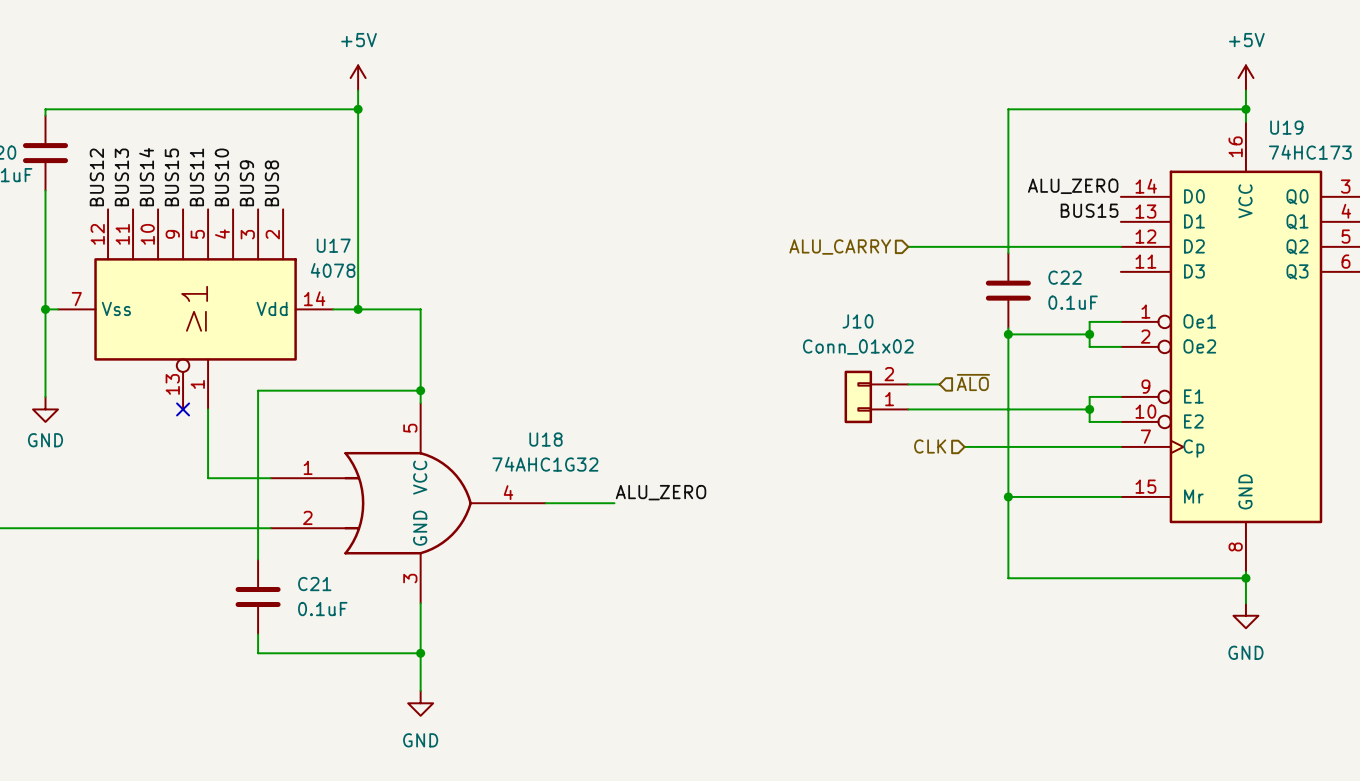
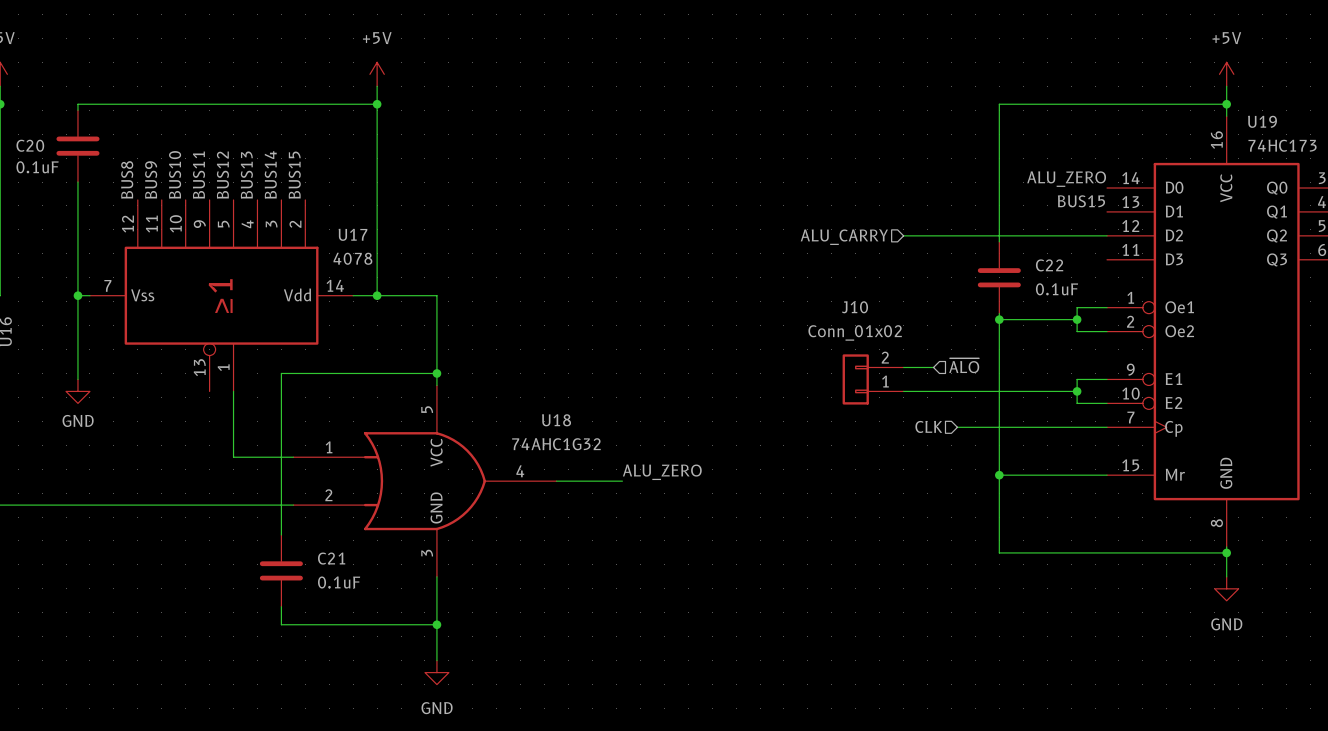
label: BUS12 (96, 177) -> BUS8 (127, 179)
label: BUS13 (121, 177) -> BUS9 (151, 179)
label: BUS14 (146, 177) -> BUS10 (175, 174)
label: BUS15 (171, 177) -> BUS11 (198, 175)
label: BUS11 (196, 177) -> BUS12 (222, 175)
label: BUS10 (221, 177) -> BUS13 (246, 175)
label: BUS9 (246, 183) -> BUS14 (270, 174)
label: BUS8 (271, 183) -> BUS15 (294, 175)
no-connect mark: (183, 409) -> none

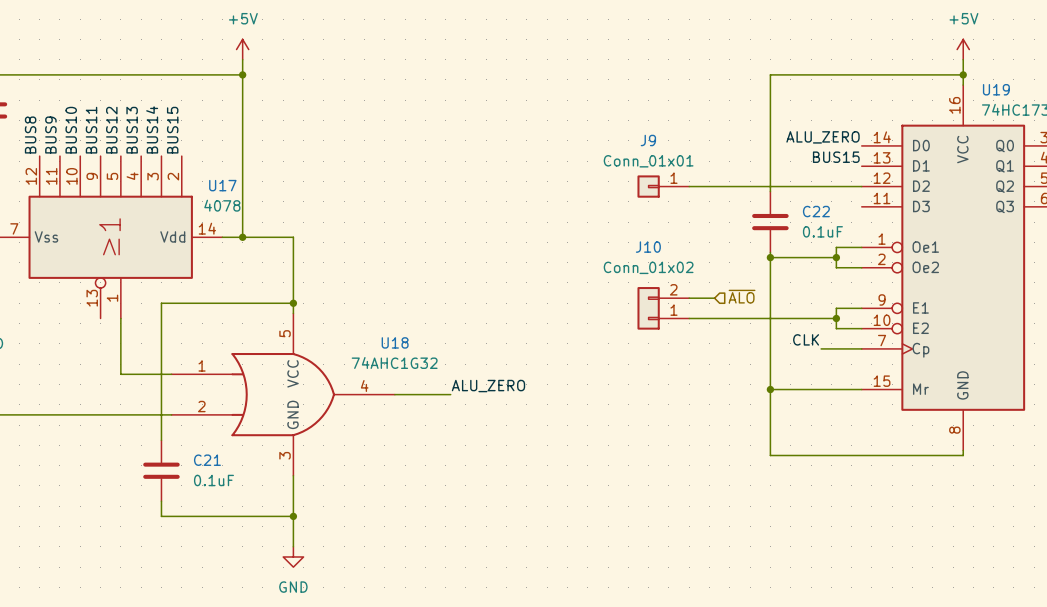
J9: none -> Conn_01x01 (663, 186)
hierarchical label: ALU_CARRY (844, 237) -> none
label: none -> CLK (806, 339)
hierarchical label: CLK (928, 426) -> none
wire: (957, 427) (1059, 427) -> none
wire: (1226, 552) (1226, 576) -> none
junction: (1226, 552) -> none
power symbol: GND (1226, 588) -> none

